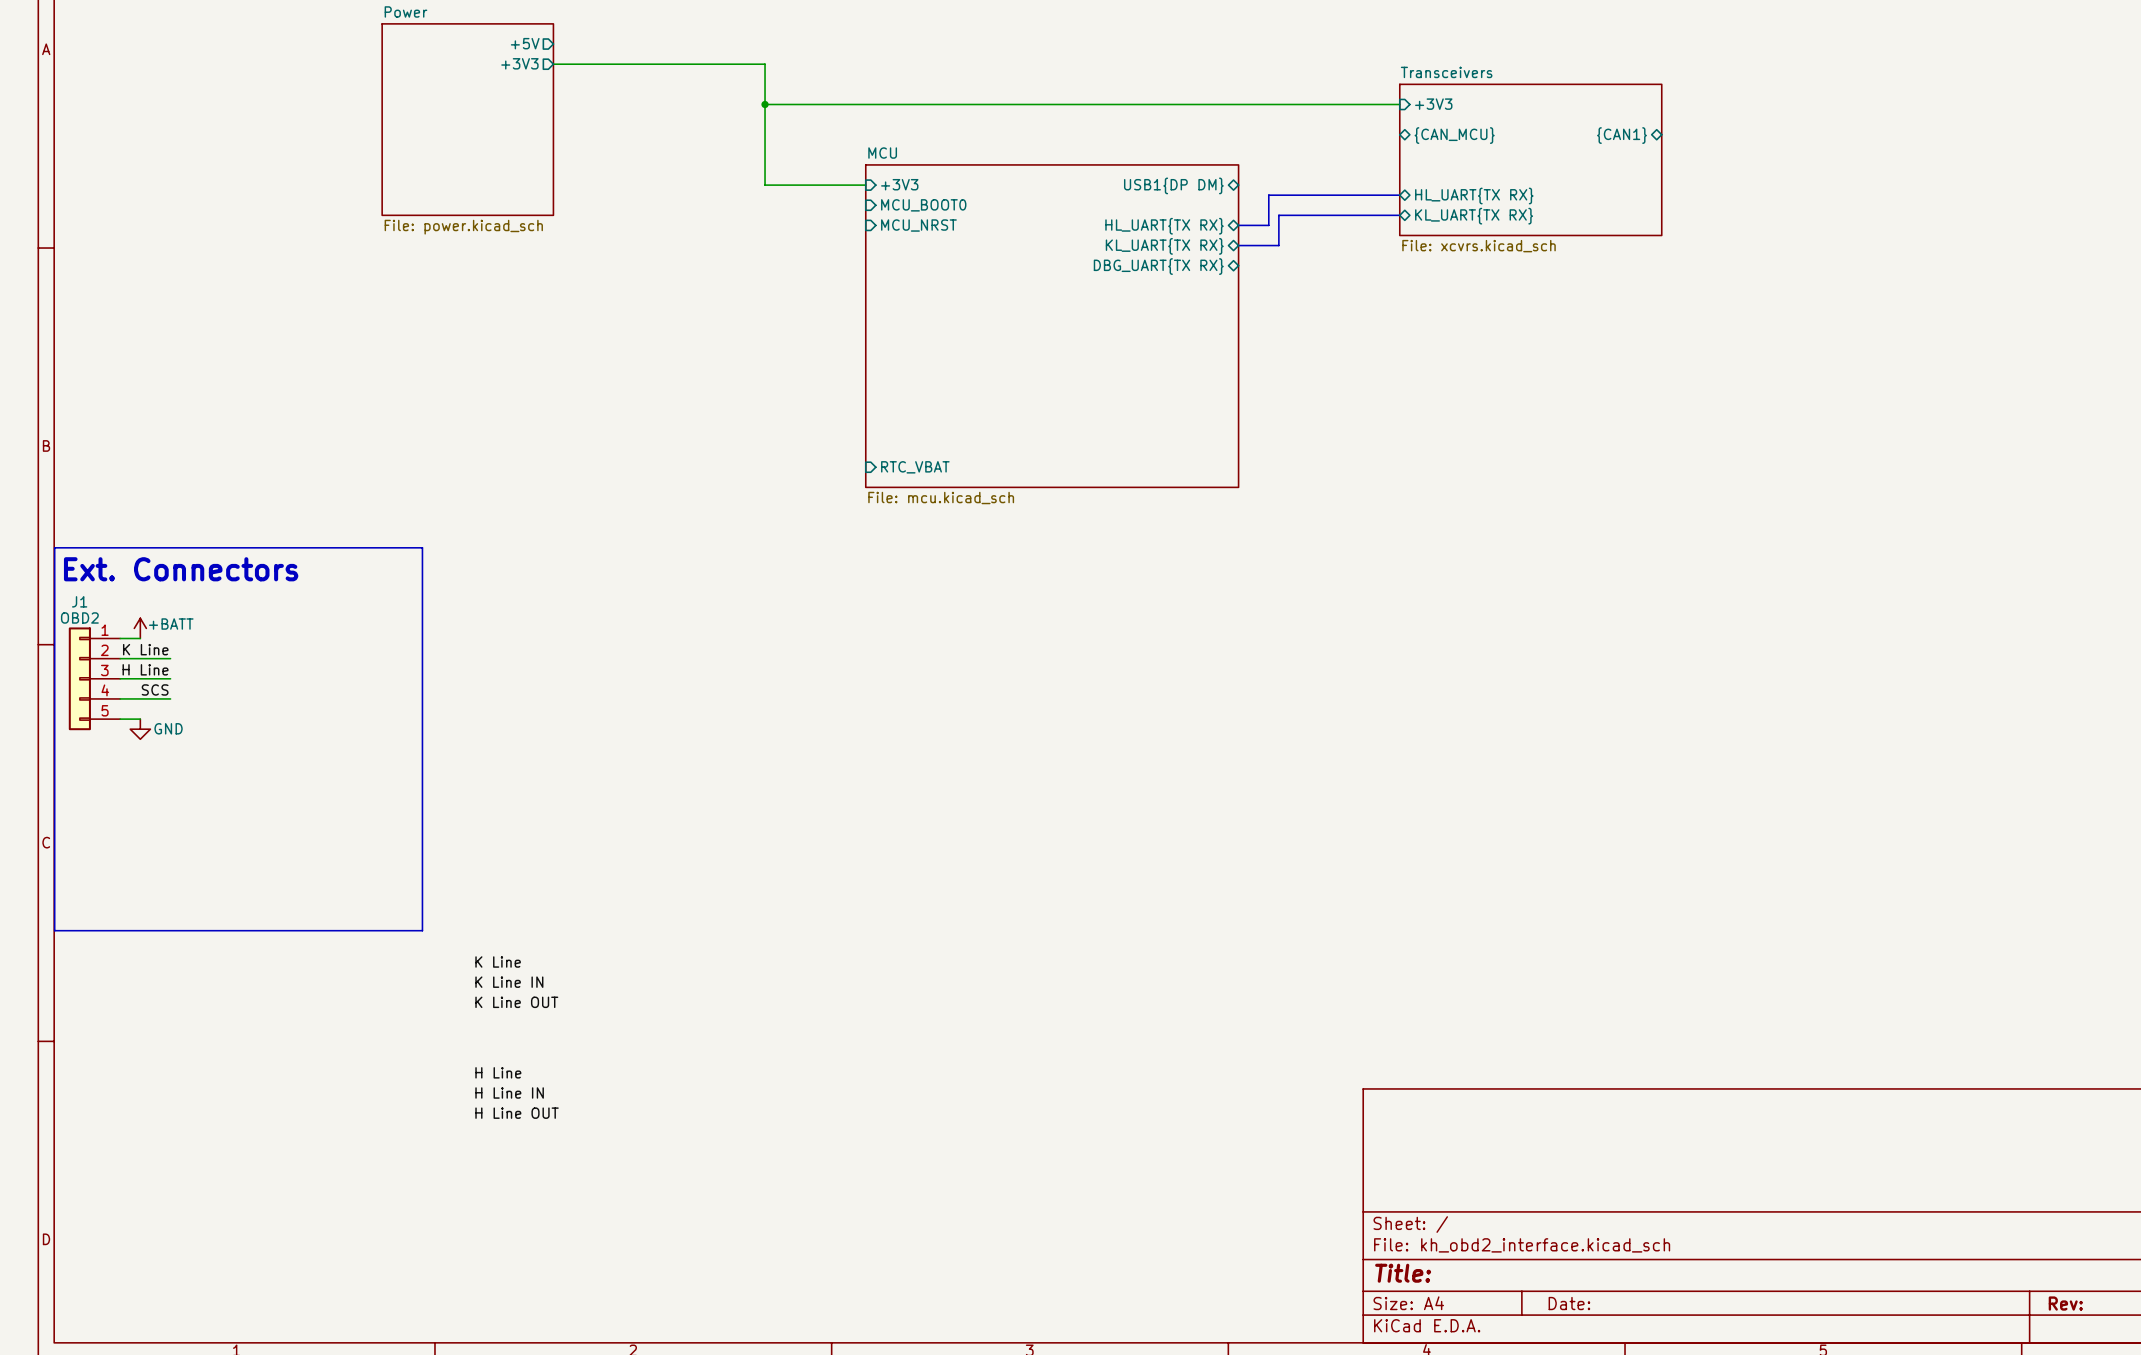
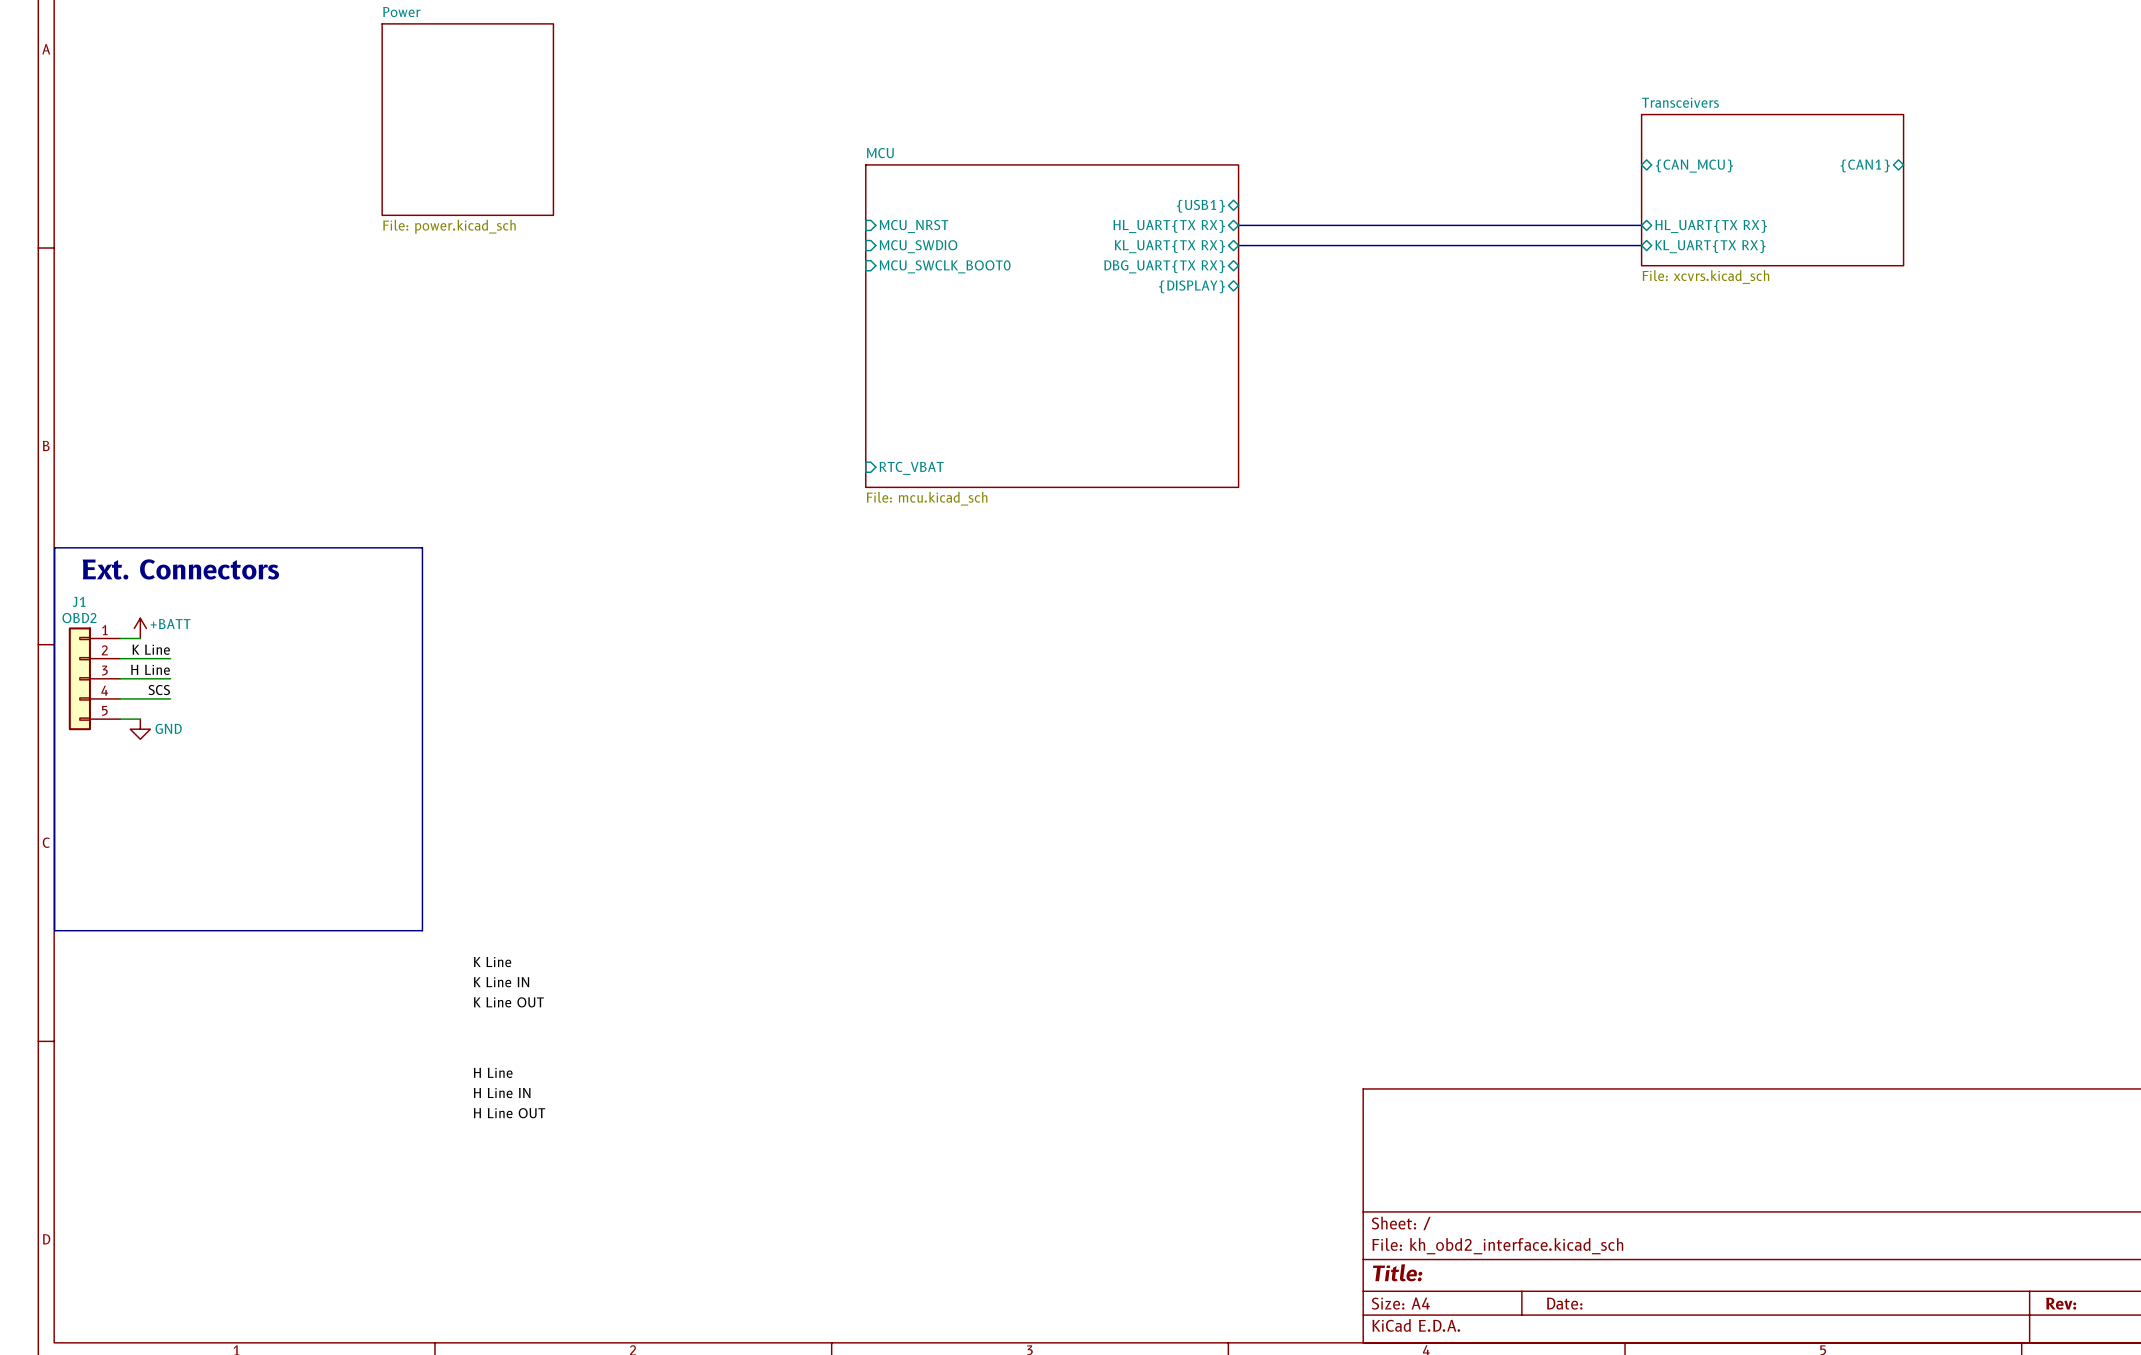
sheet pin: +5V (525, 43) -> none
sheet pin: +3V3 (519, 63) -> none
wire: (553, 64) (765, 64) (765, 185) (865, 185) -> none
wire: (765, 104) (1399, 104) -> none
junction: (765, 104) -> none
sheet pin: +3V3 (1433, 104) -> none
sheet pin: {CAN_MCU} (1454, 135) -> none
sheet pin: {CAN1} (1622, 135) -> none
sheet Transceivers: File: xcvrs.kicad_sch (1530, 159) -> none
sheet pin: none -> {CAN_MCU} (1694, 166)
sheet pin: none -> {CAN1} (1865, 165)
sheet pin: +3V3 (899, 184) -> none
sheet pin: USB1{DP DM} (1173, 185) -> none
sheet Transceivers: none -> File: xcvrs.kicad_sch (1772, 190)
bus: (1399, 195) (1268, 195) (1268, 225) -> (1641, 225) (1268, 225)
sheet pin: HL_UART{TX RX} (1474, 196) -> none
sheet pin: MCU_BOOT0 (923, 205) -> none
sheet pin: none -> {USB1} (1200, 206)
bus: (1399, 215) (1278, 215) (1278, 245) -> (1641, 245) (1278, 245)
sheet pin: KL_UART{TX RX} (1474, 216) -> none
sheet pin: none -> HL_UART{TX RX} (1711, 226)
sheet pin: none -> MCU_SWDIO (918, 246)
sheet pin: none -> KL_UART{TX RX} (1710, 246)
sheet pin: none -> MCU_SWCLK_BOOT0 (945, 266)
sheet pin: none -> {DISPLAY} (1191, 286)

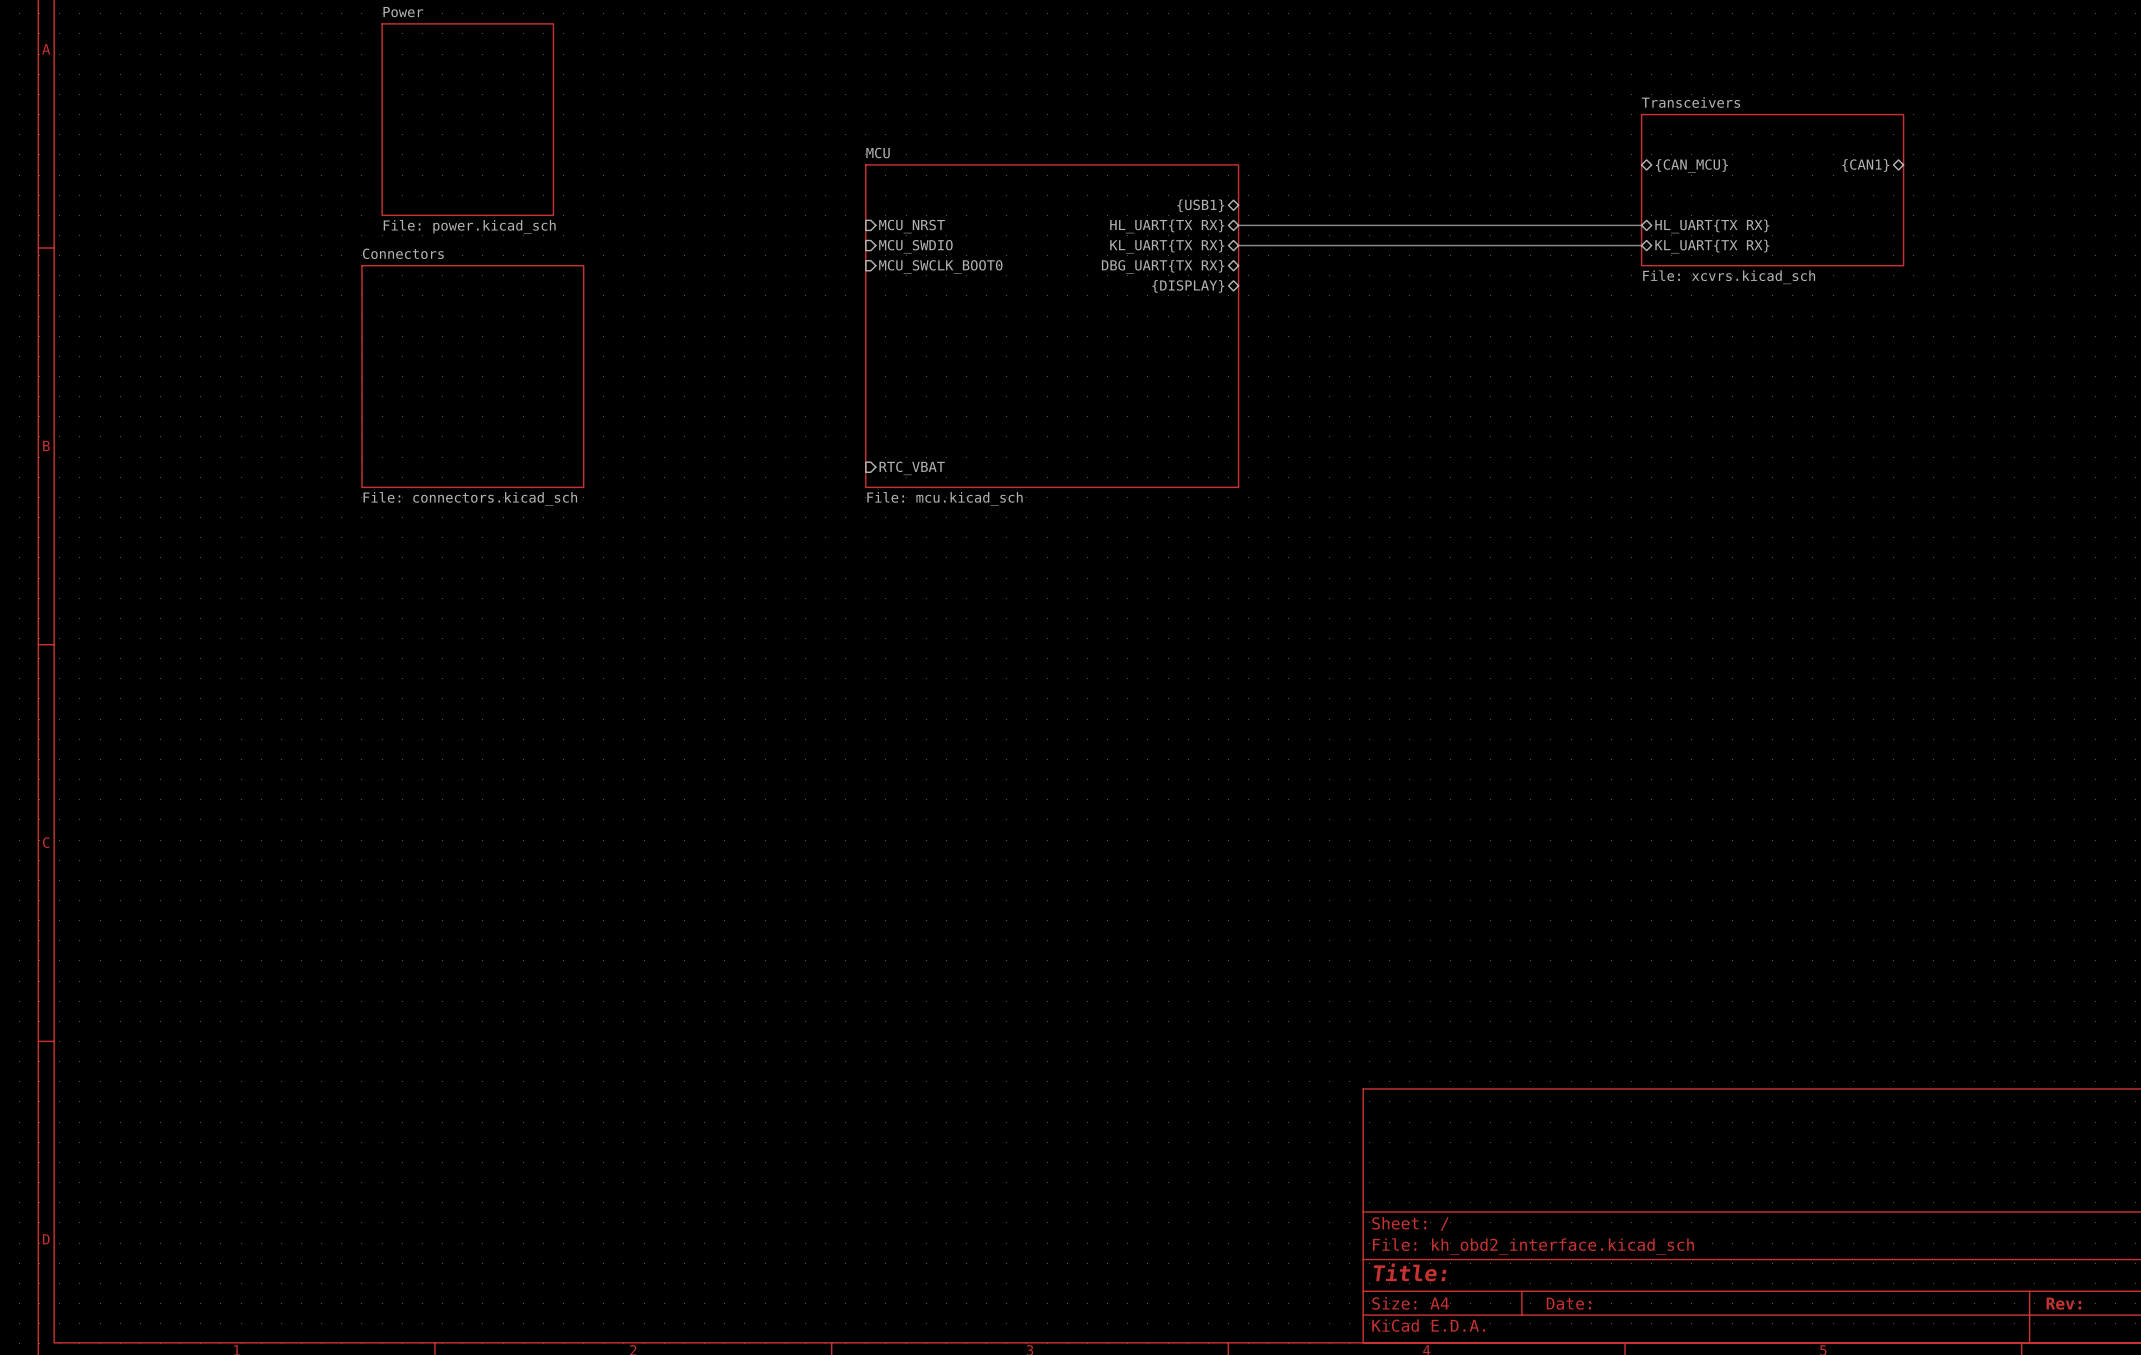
sheet Connectors: none -> File: connectors.kicad_sch (472, 376)
line: (54, 547) (422, 547) (422, 930) (54, 930) (54, 547) -> none
text: Ext. Connectors (180, 569) -> none
power symbol: +BATT (140, 628) -> none
wire: (120, 638) (140, 638) -> none
label: K Line (151, 649) -> none
wire: (120, 658) (170, 658) -> none
label: H Line (150, 669) -> none
J1: OBD2 (94, 678) -> none
wire: (120, 678) (170, 678) -> none
label: SCS (159, 690) -> none
wire: (120, 698) (170, 698) -> none
wire: (120, 719) (140, 719) -> none
power symbol: GND (140, 729) -> none
label: K Line (492, 962) -> none
label: K Line IN (501, 982) -> none
label: K Line OUT (508, 1002) -> none
label: H Line (493, 1072) -> none
label: H Line IN (502, 1093) -> none
label: H Line OUT (509, 1113) -> none

